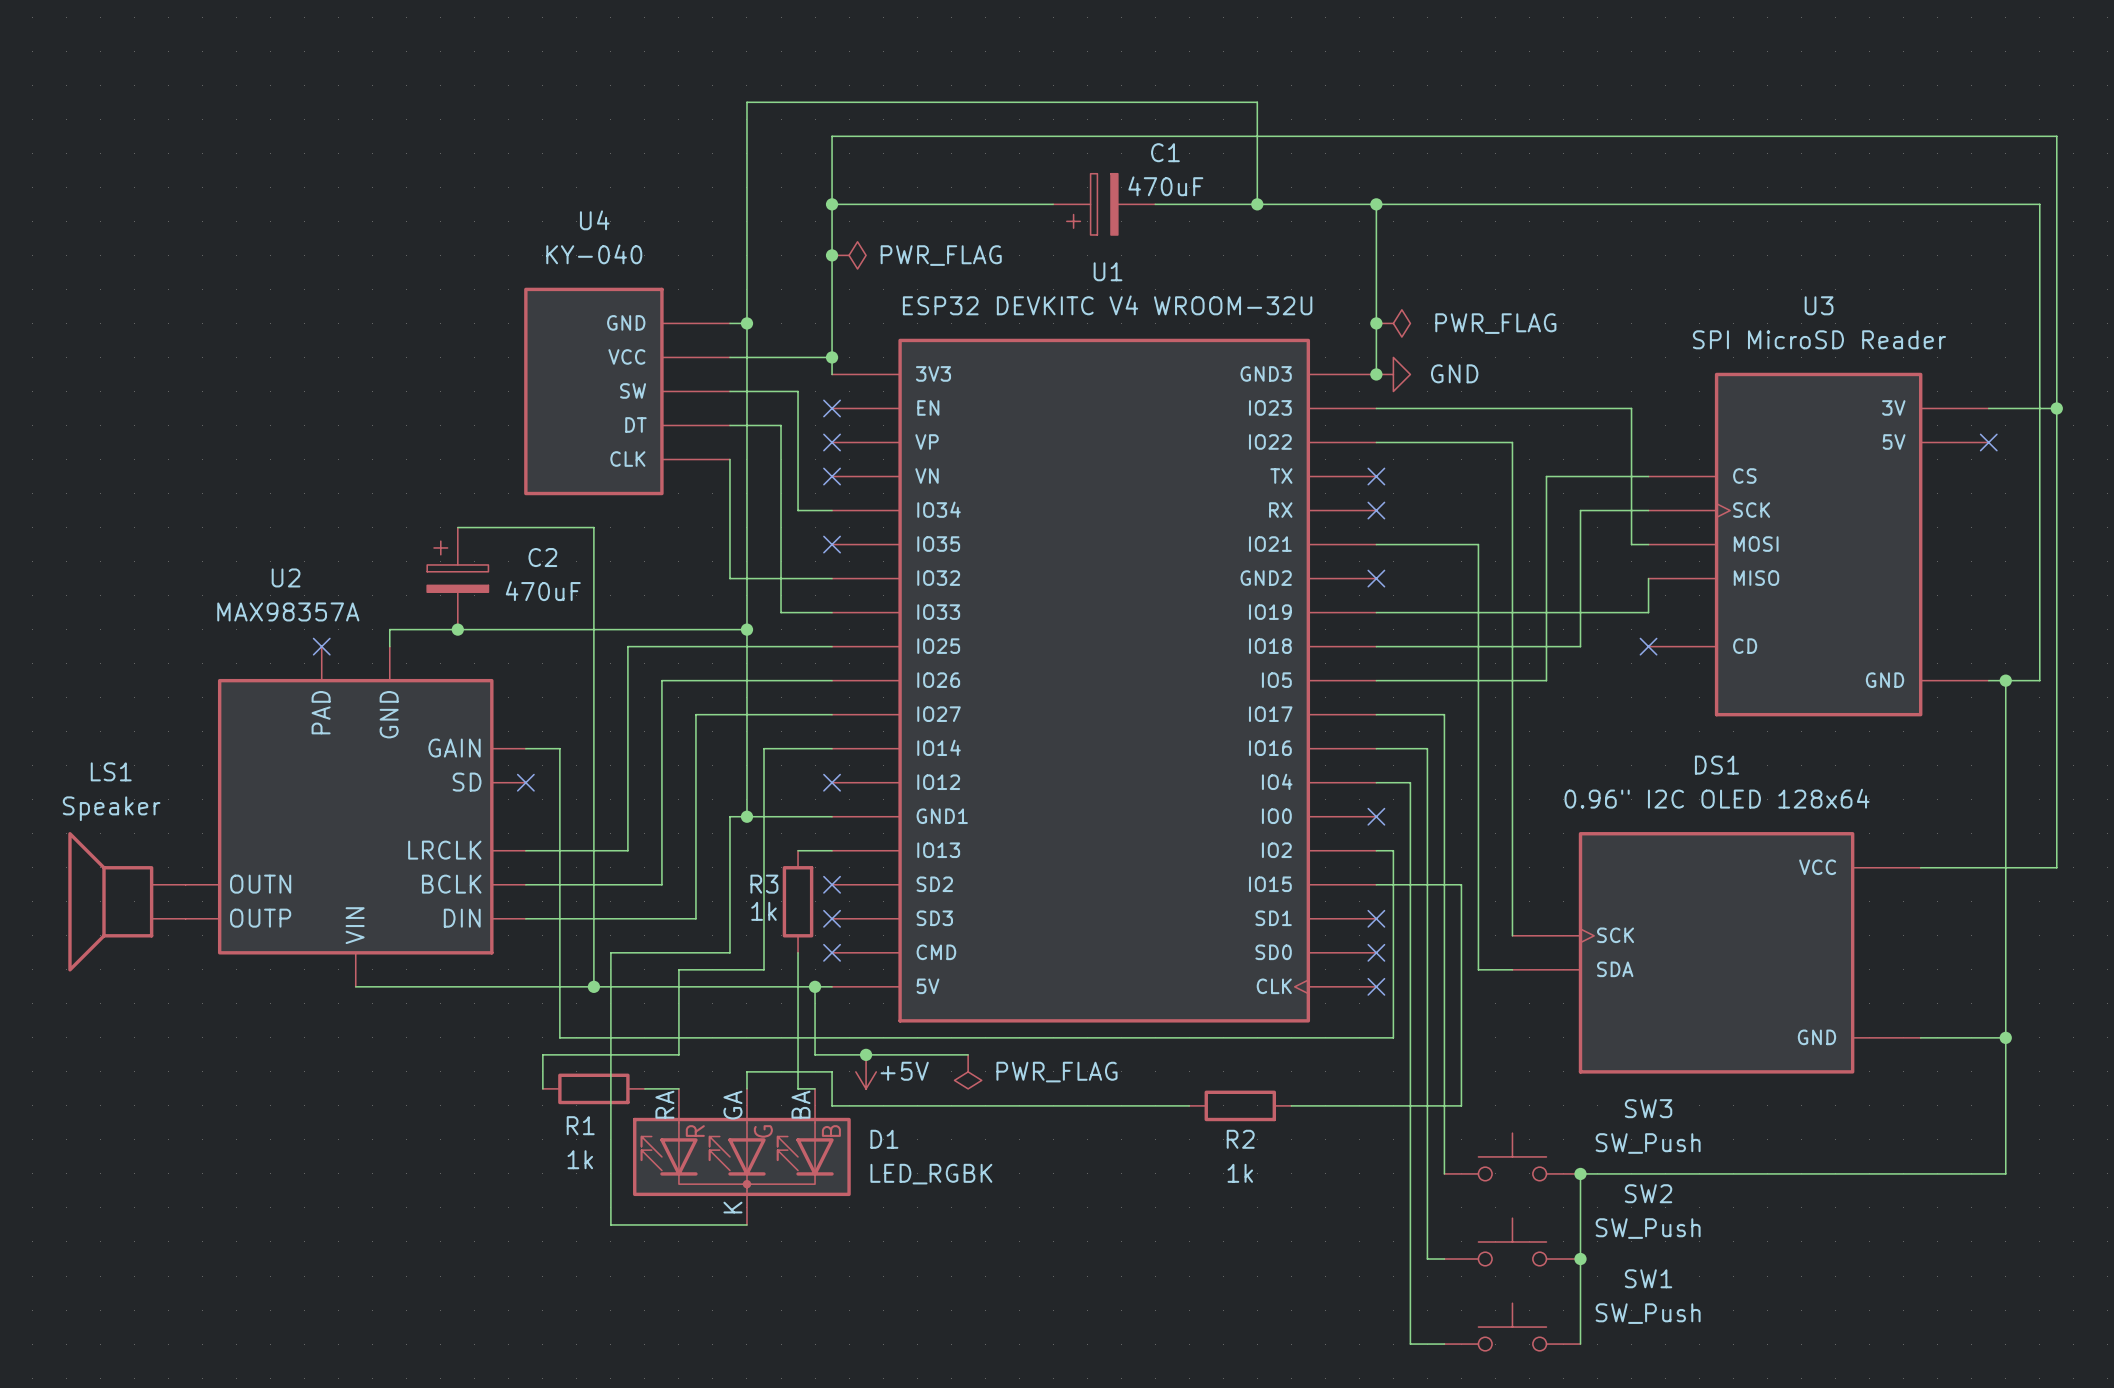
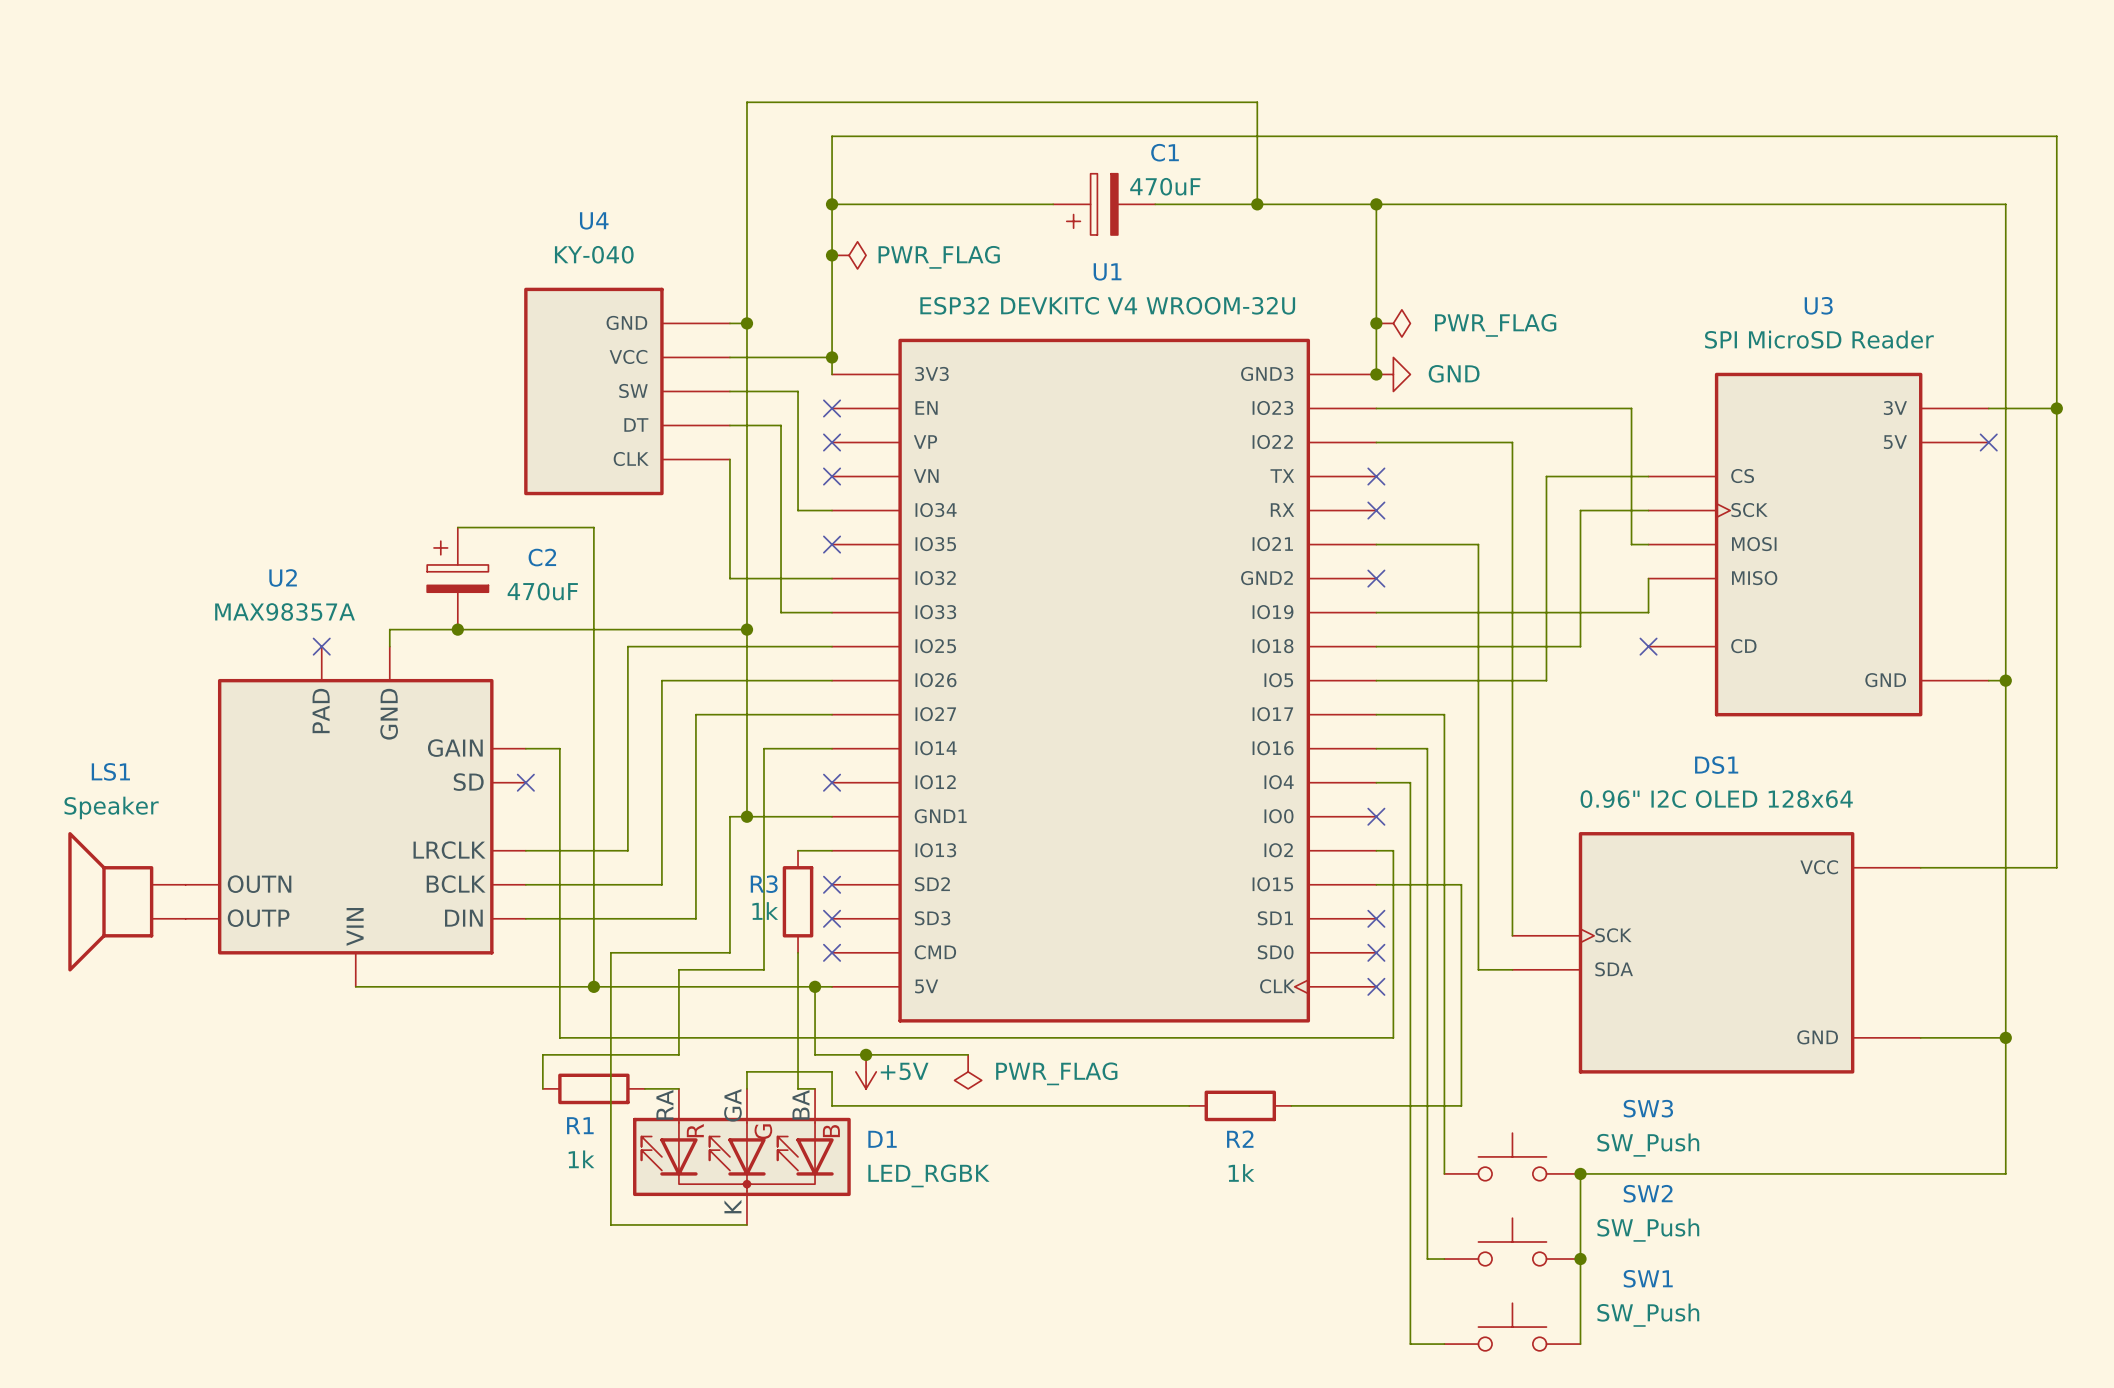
wire: (2005, 204) (2039, 204) (2039, 680) (2005, 680) -> (2005, 204) (2005, 680)

